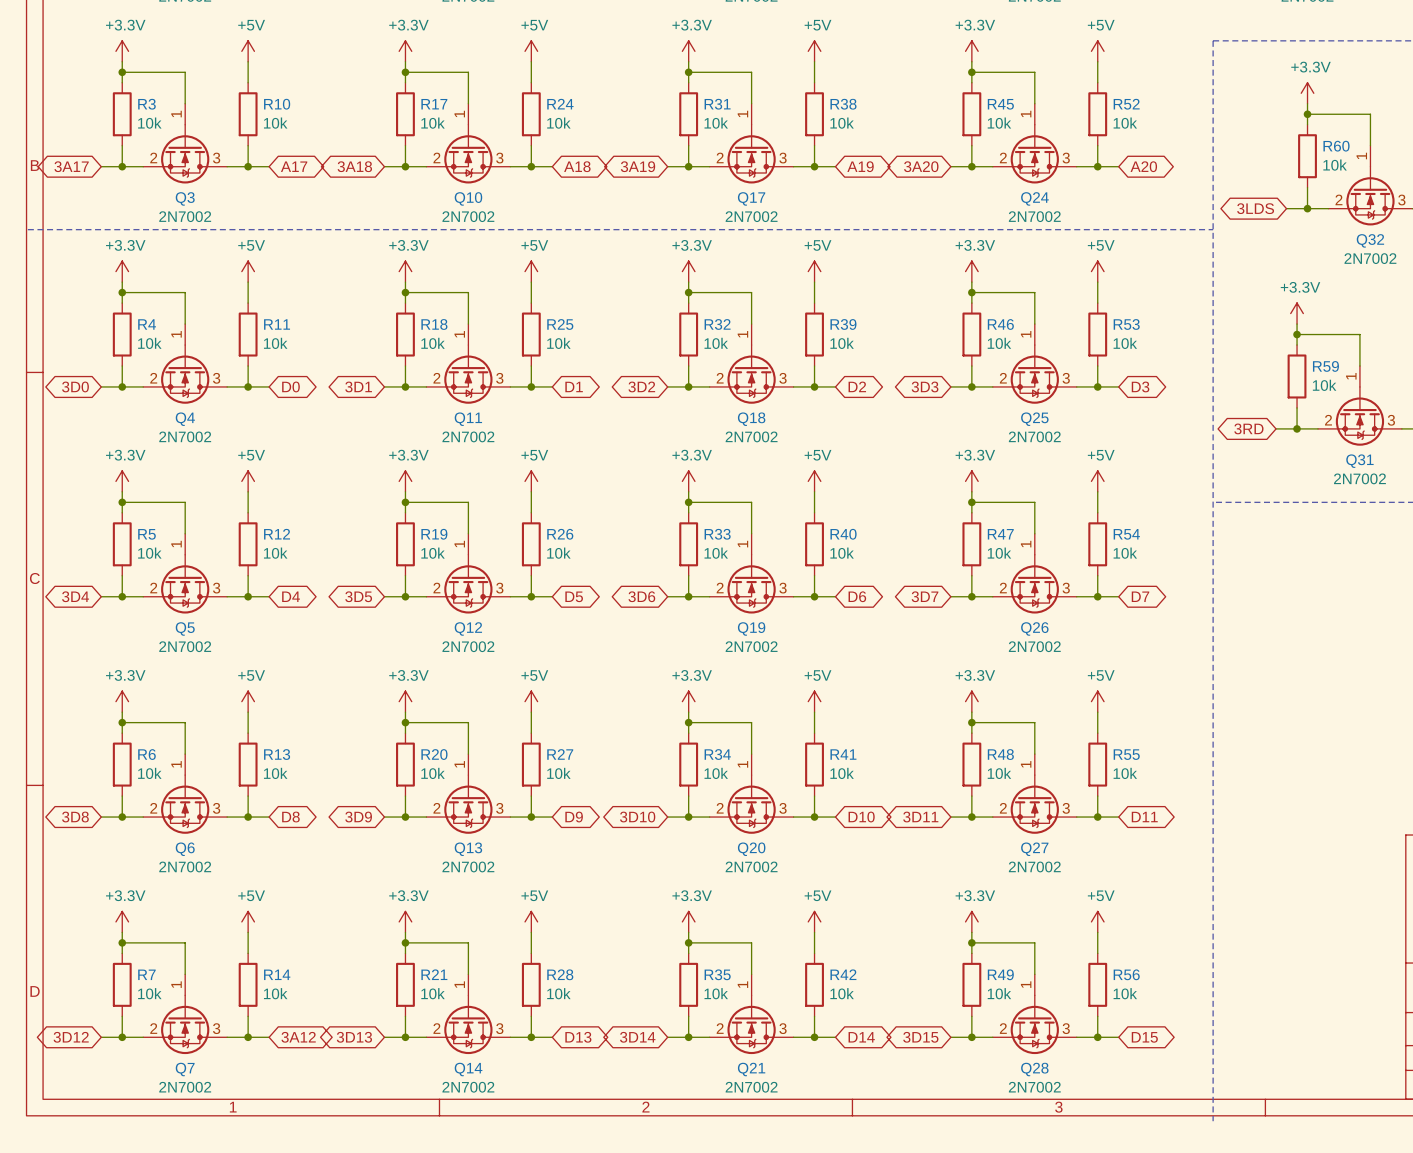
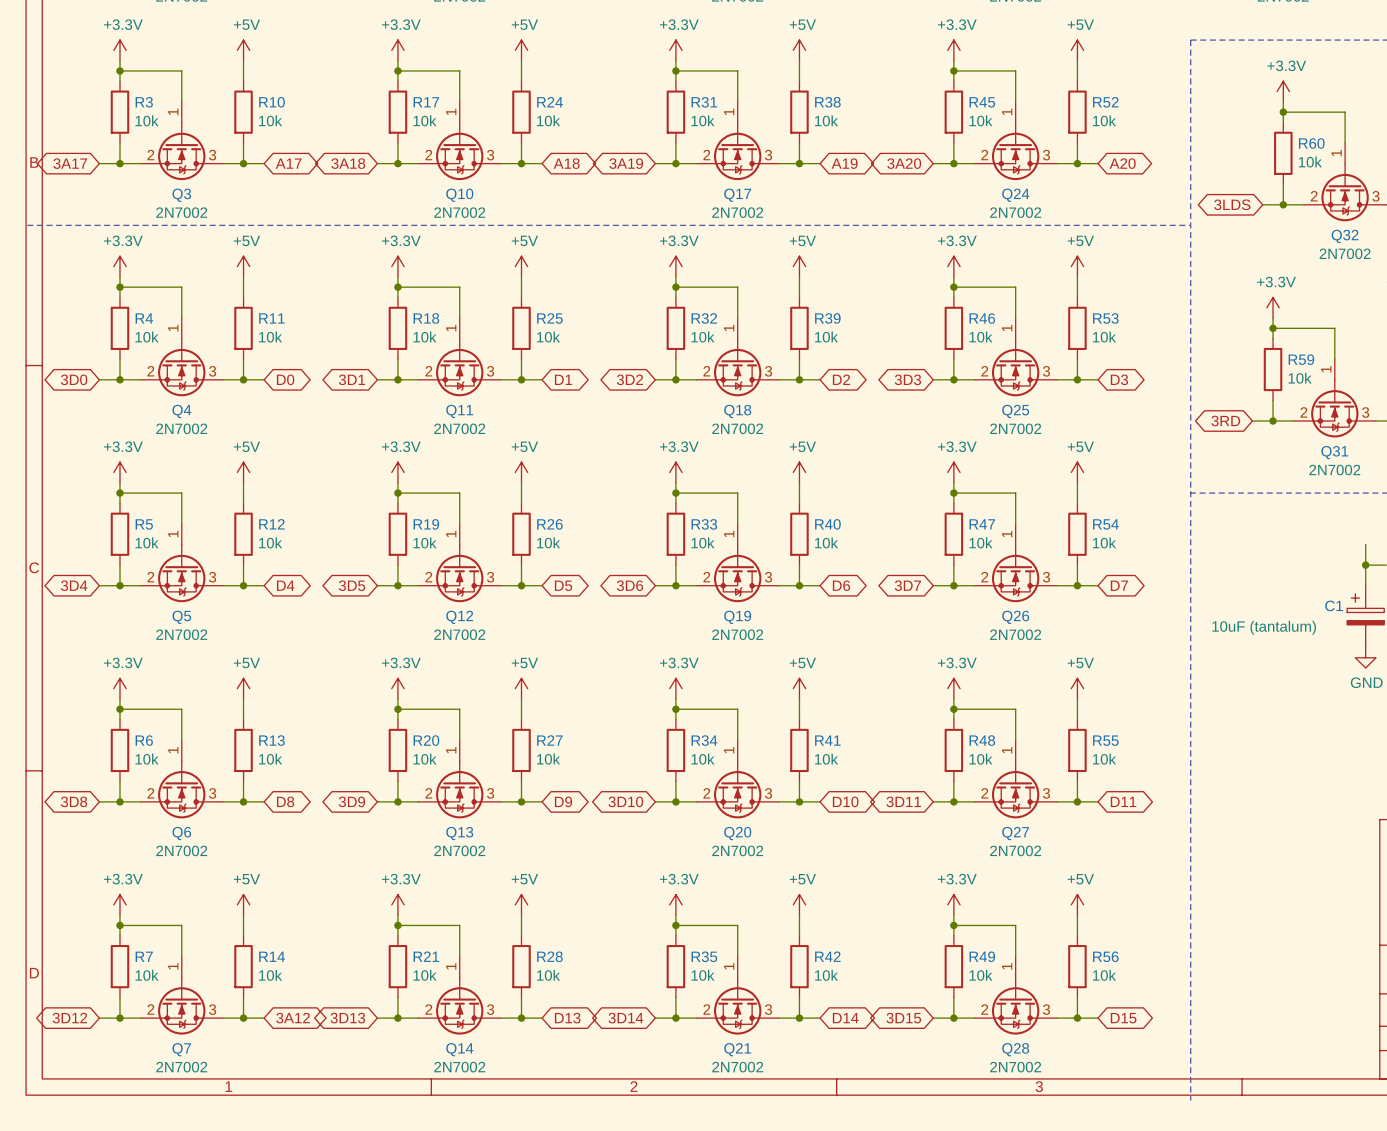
wire: none -> (1365, 544) (1365, 585)
wire: none -> (1365, 565) (1386, 565)
junction: none -> (1365, 565)
C1: none -> 10uF (tantalum) (1365, 616)
power symbol: none -> GND (1365, 657)

